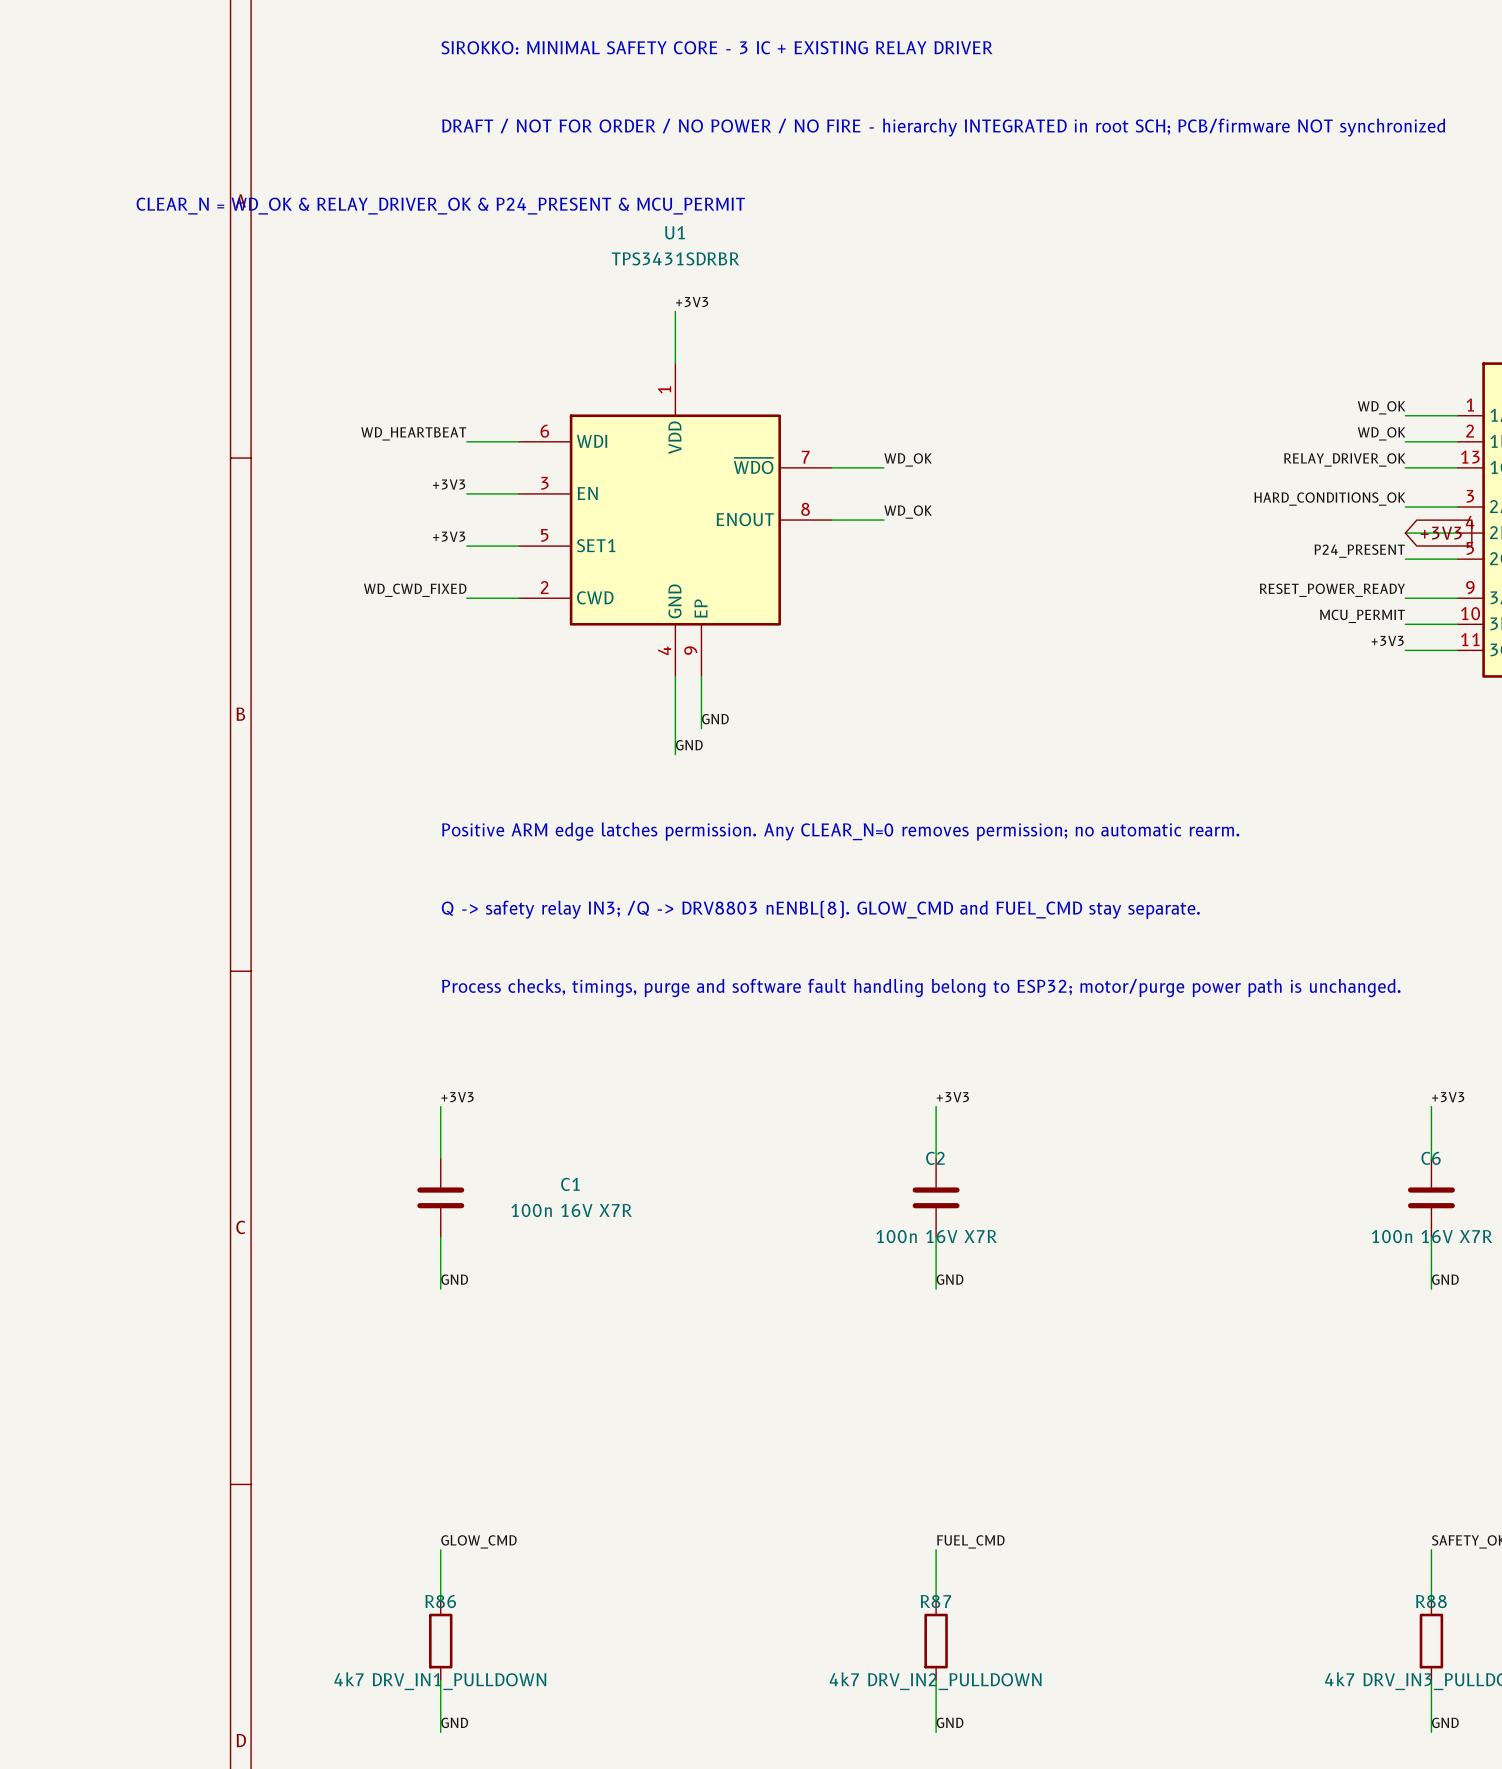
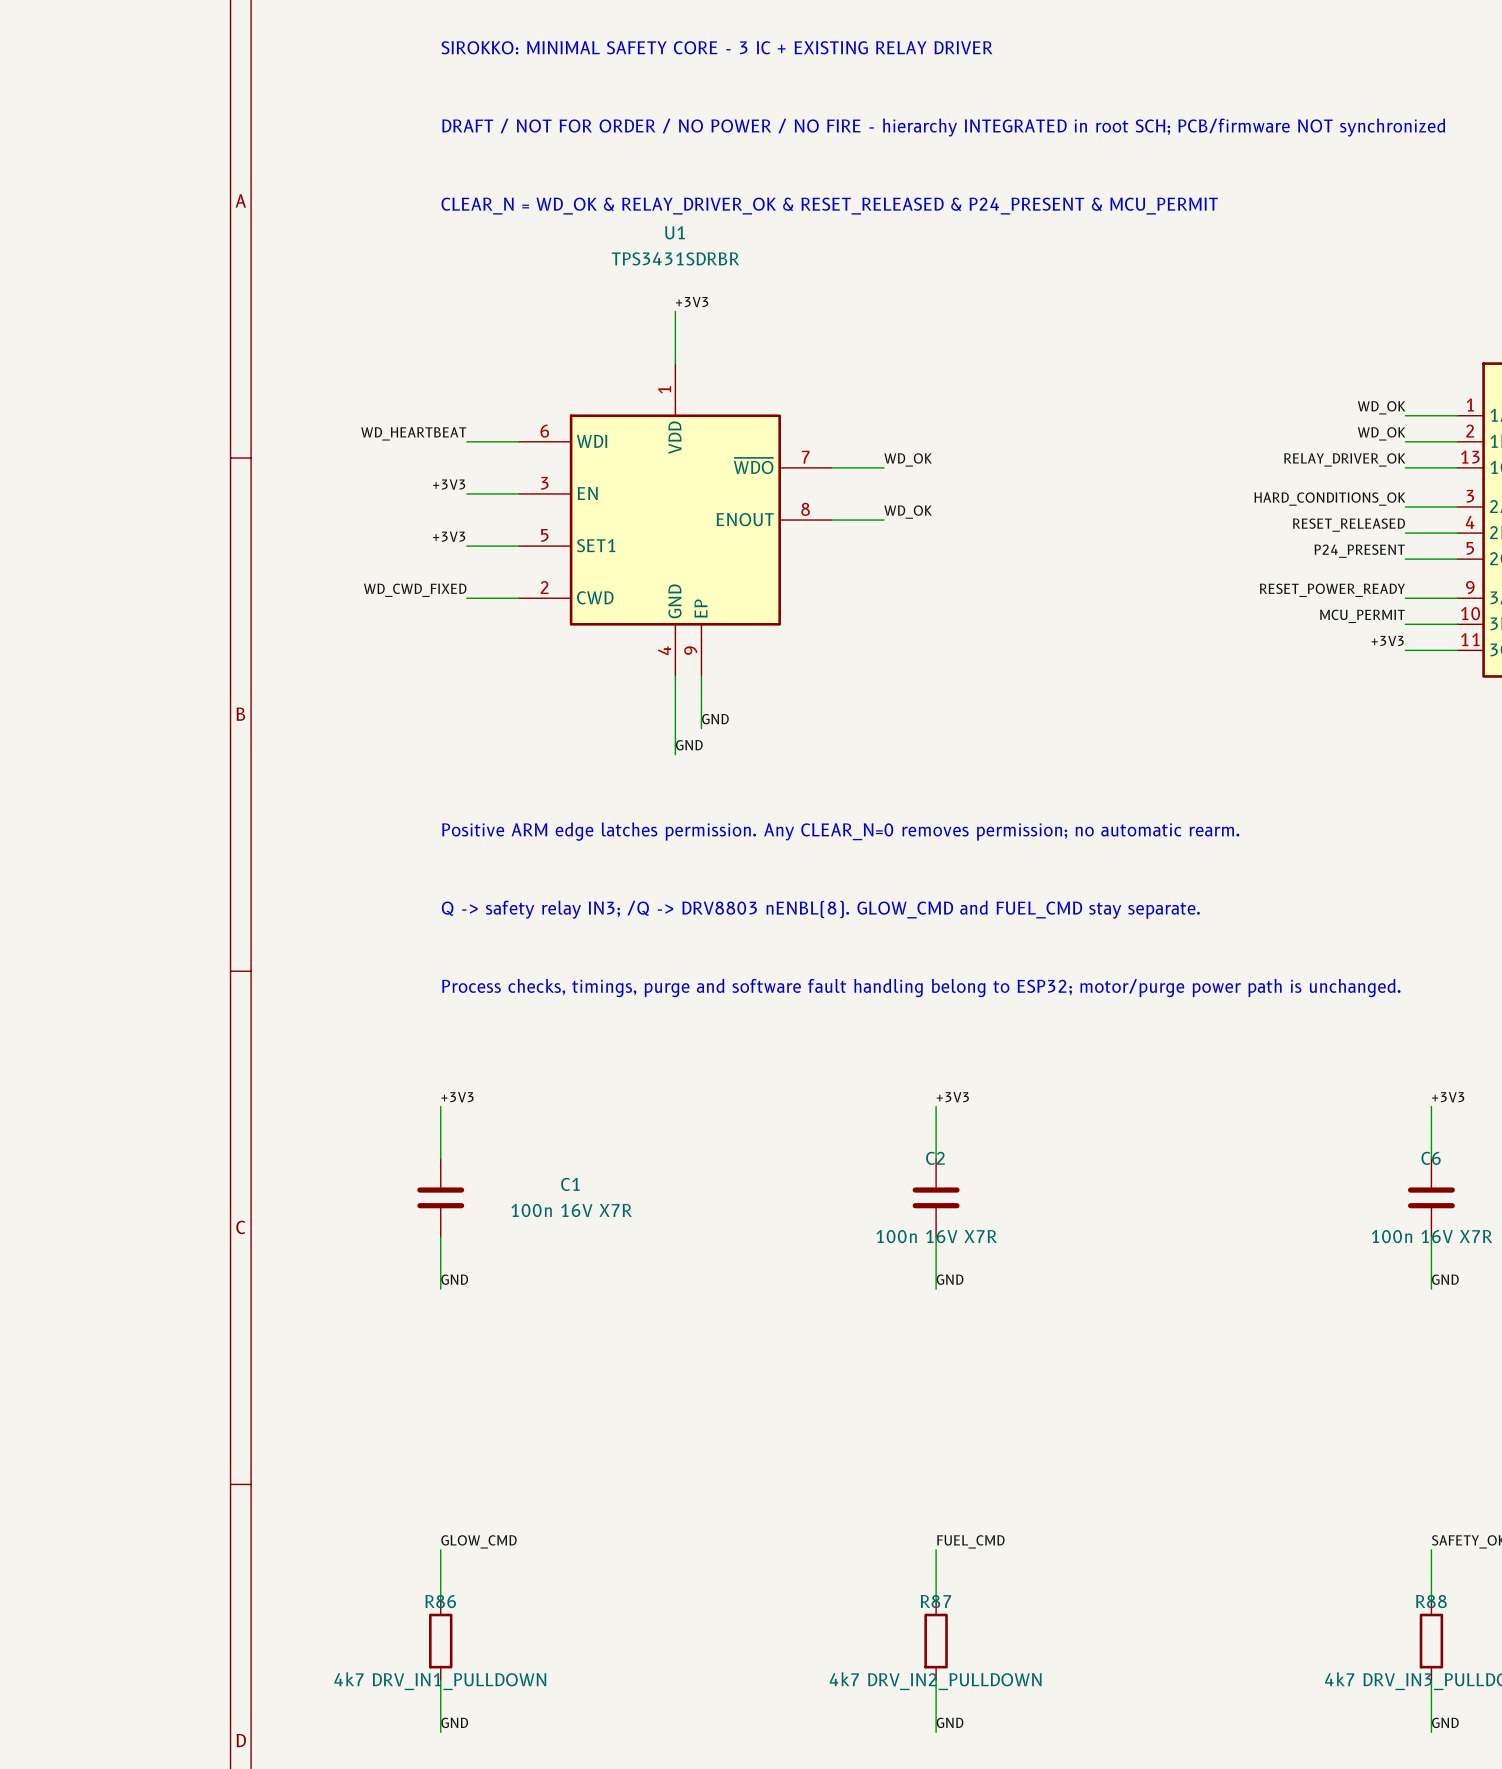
text: CLEAR_N = WD_OK & RELAY_DRIVER_OK & P24_PRESENT & MCU_PERMIT (440, 206) -> CLEAR_N = WD_OK & RELAY_DRIVER_OK & RESET_RELEASED & P24_PRESENT & MCU_PERMIT (829, 206)
label: none -> RESET_RELEASED (1348, 525)
global label: +3V3 (1441, 533) -> none

